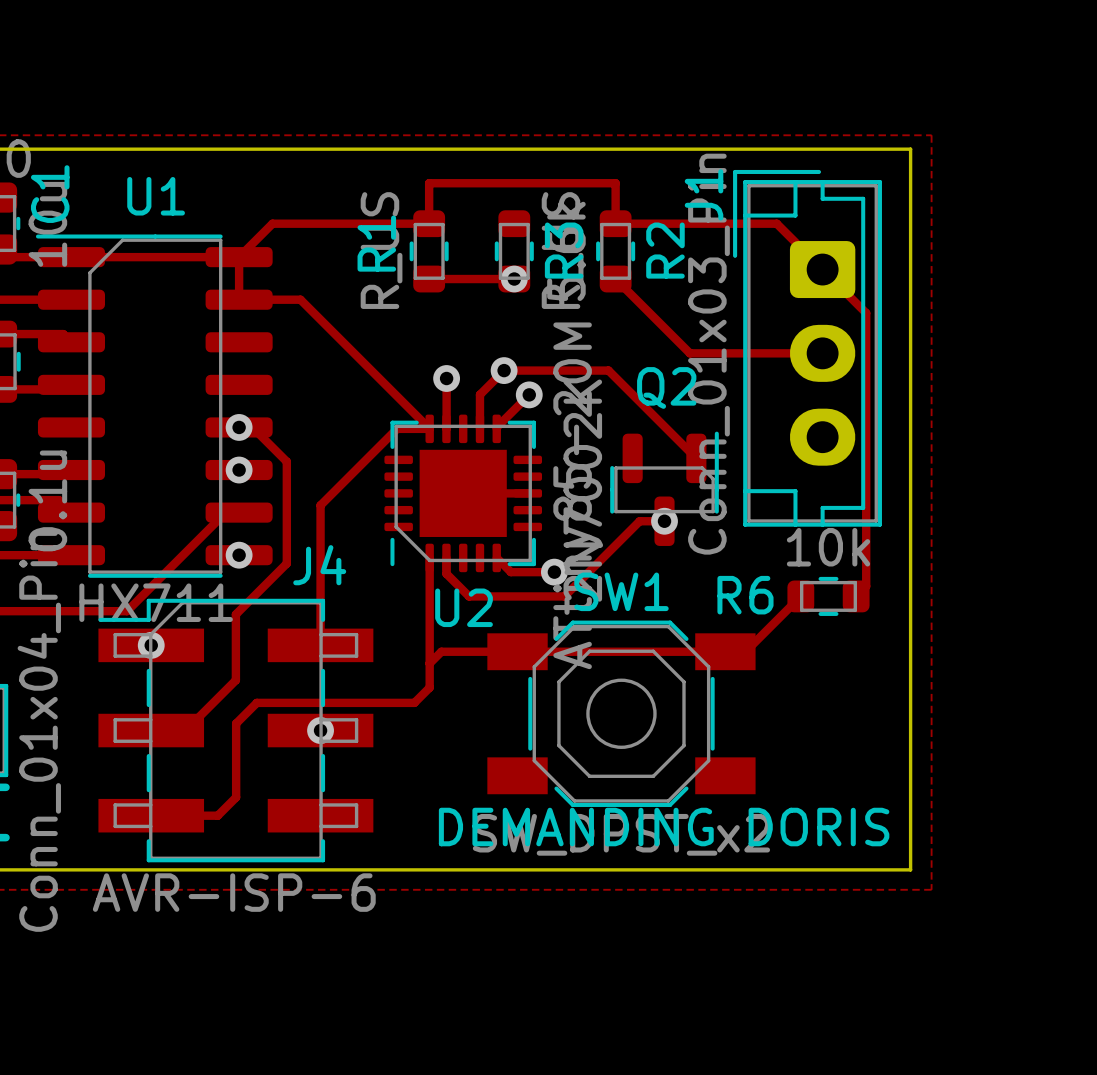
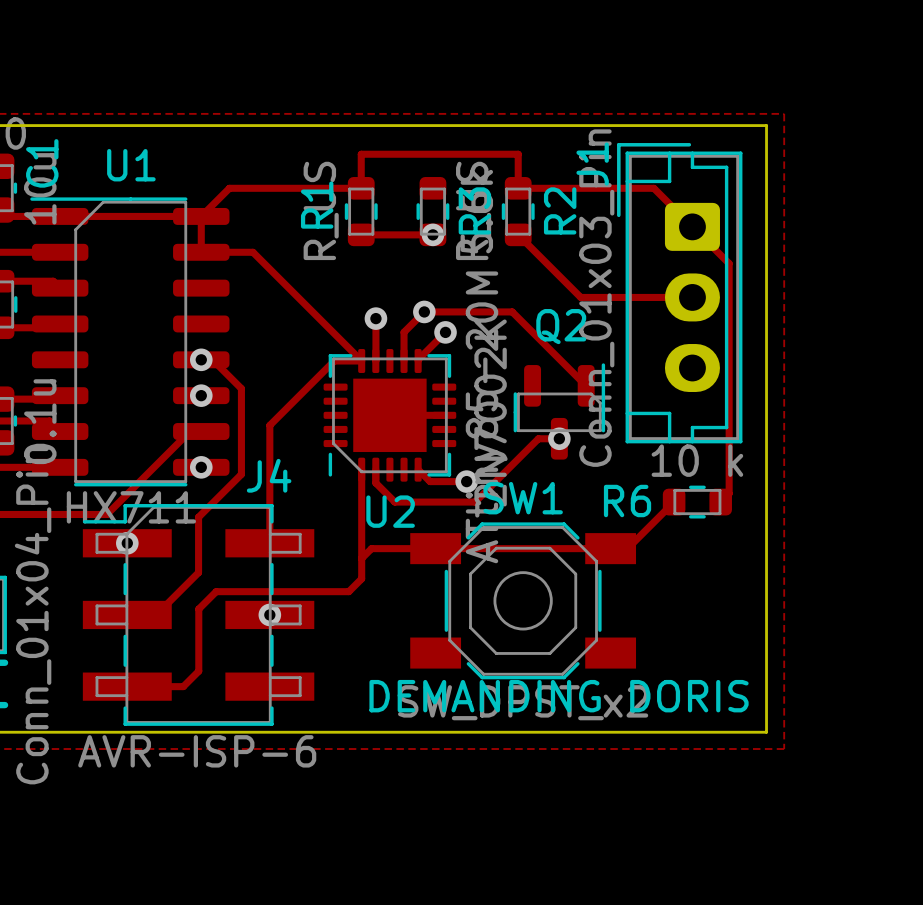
R6 value: 10k (828, 547) -> 10 k (697, 460)

